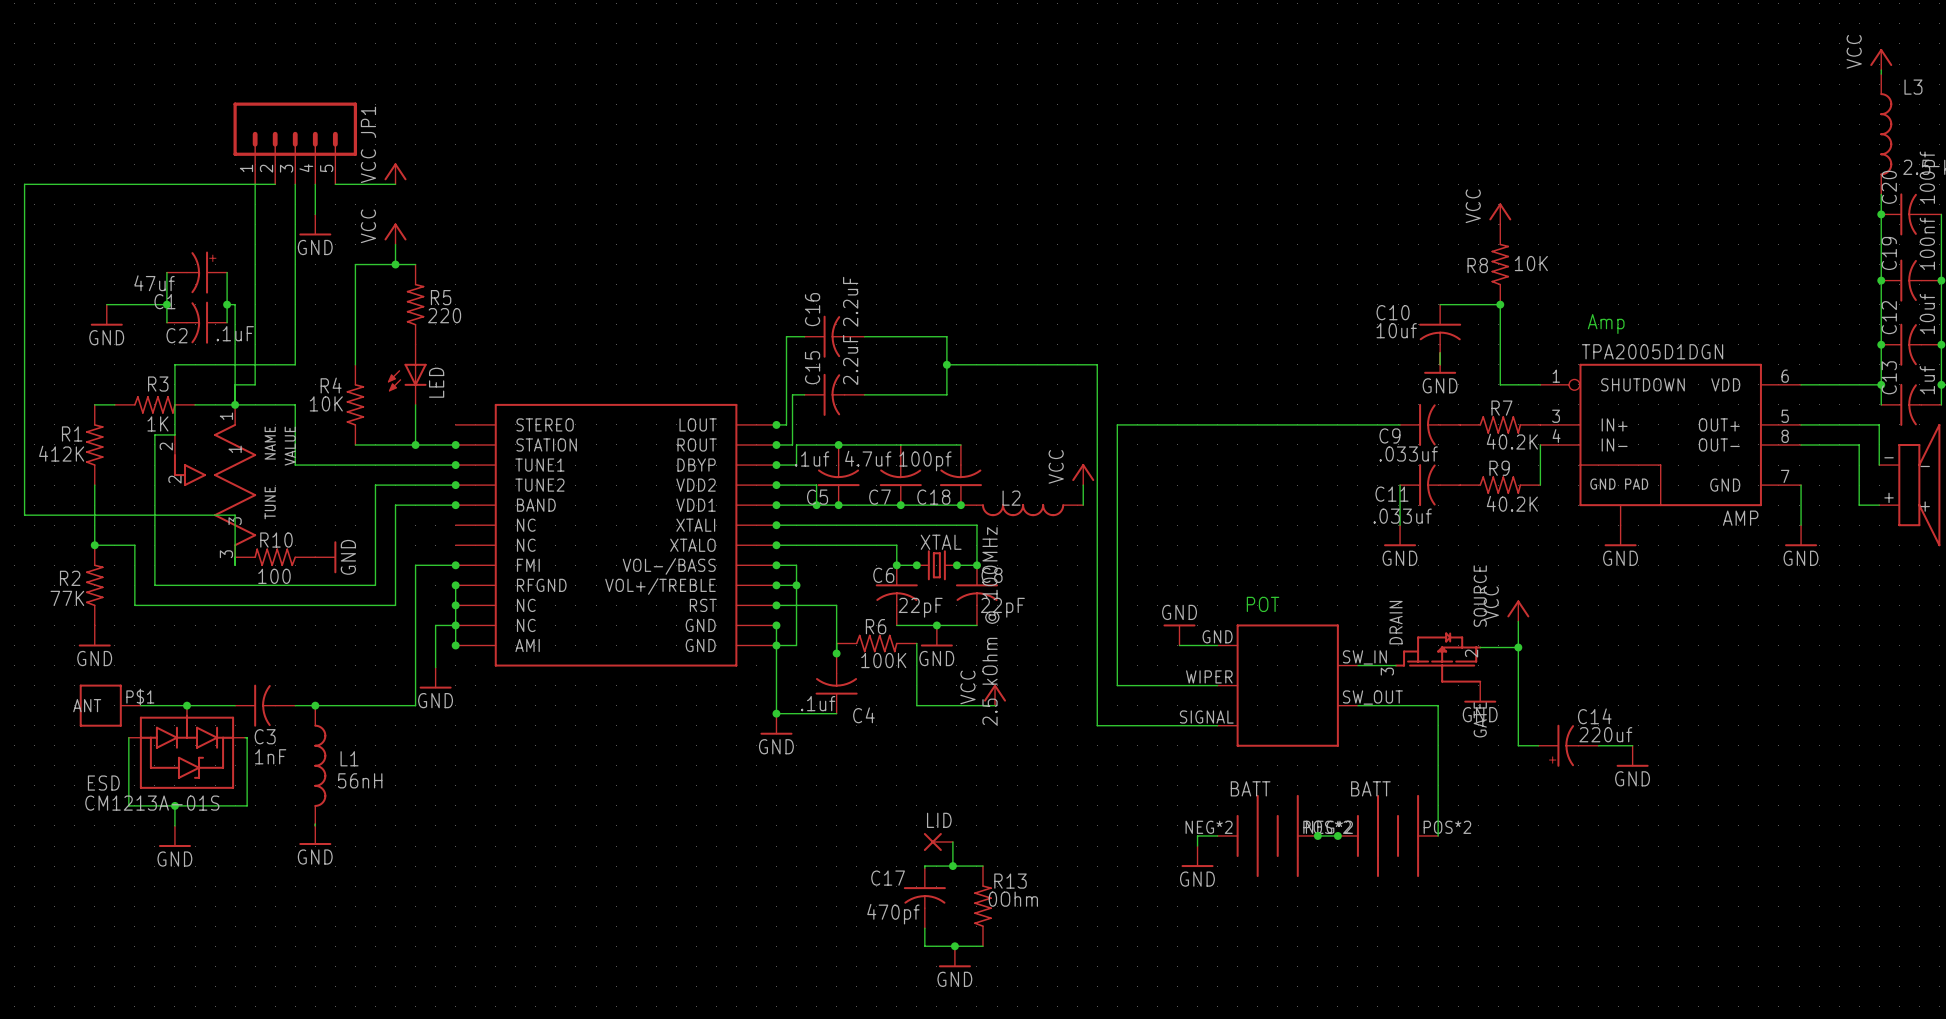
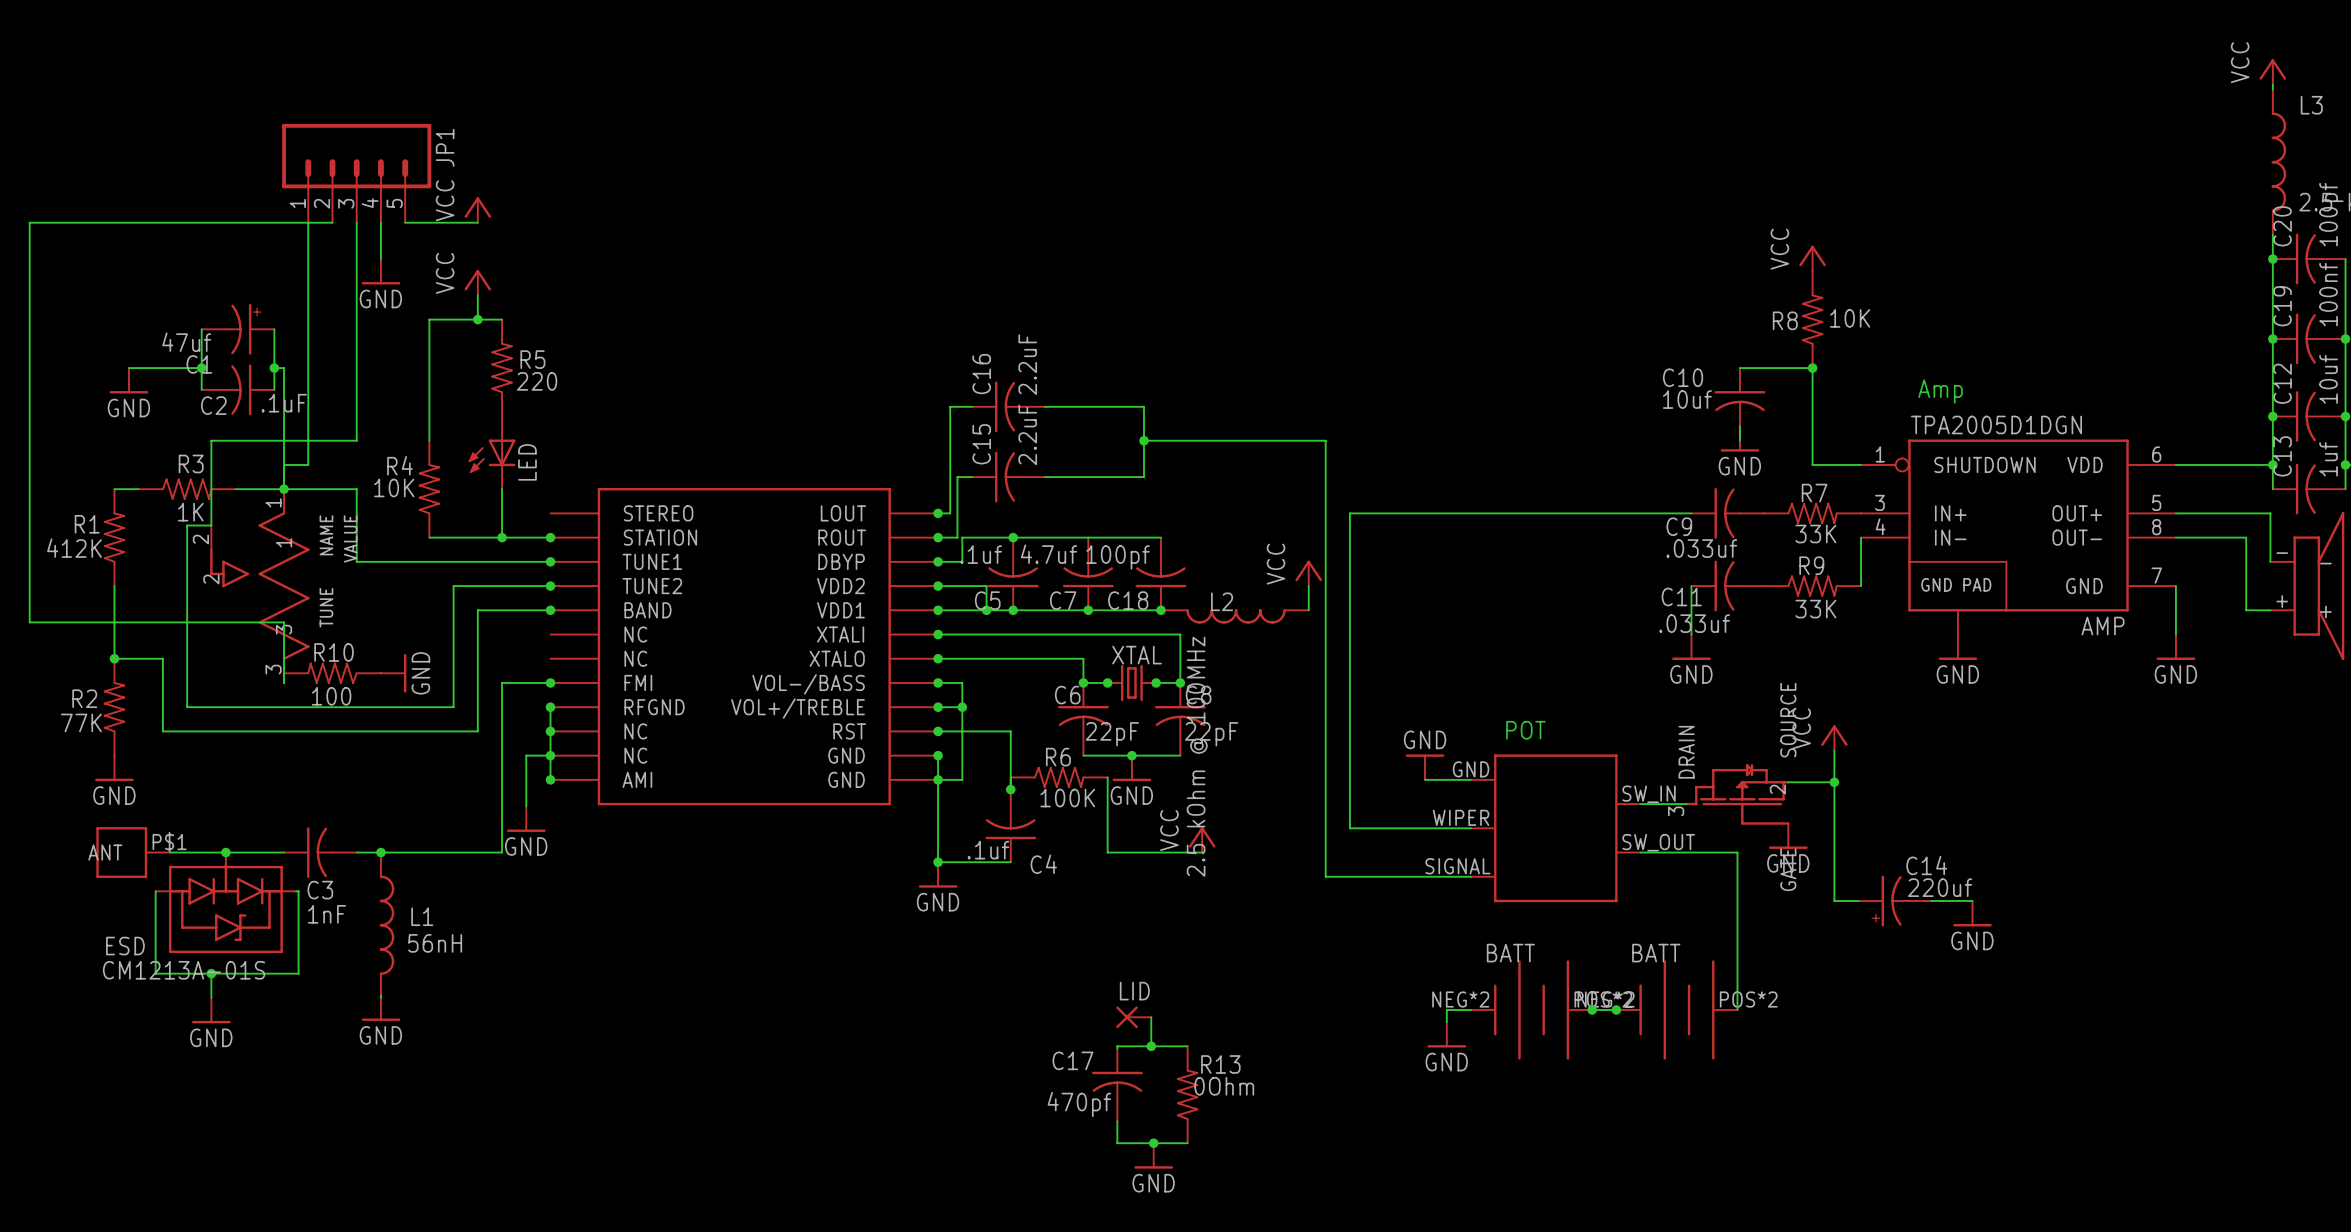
R7 value: 40.2K (1512, 441) -> 33K (1815, 533)
R9 value: 40.2K (1512, 503) -> 33K (1815, 609)

